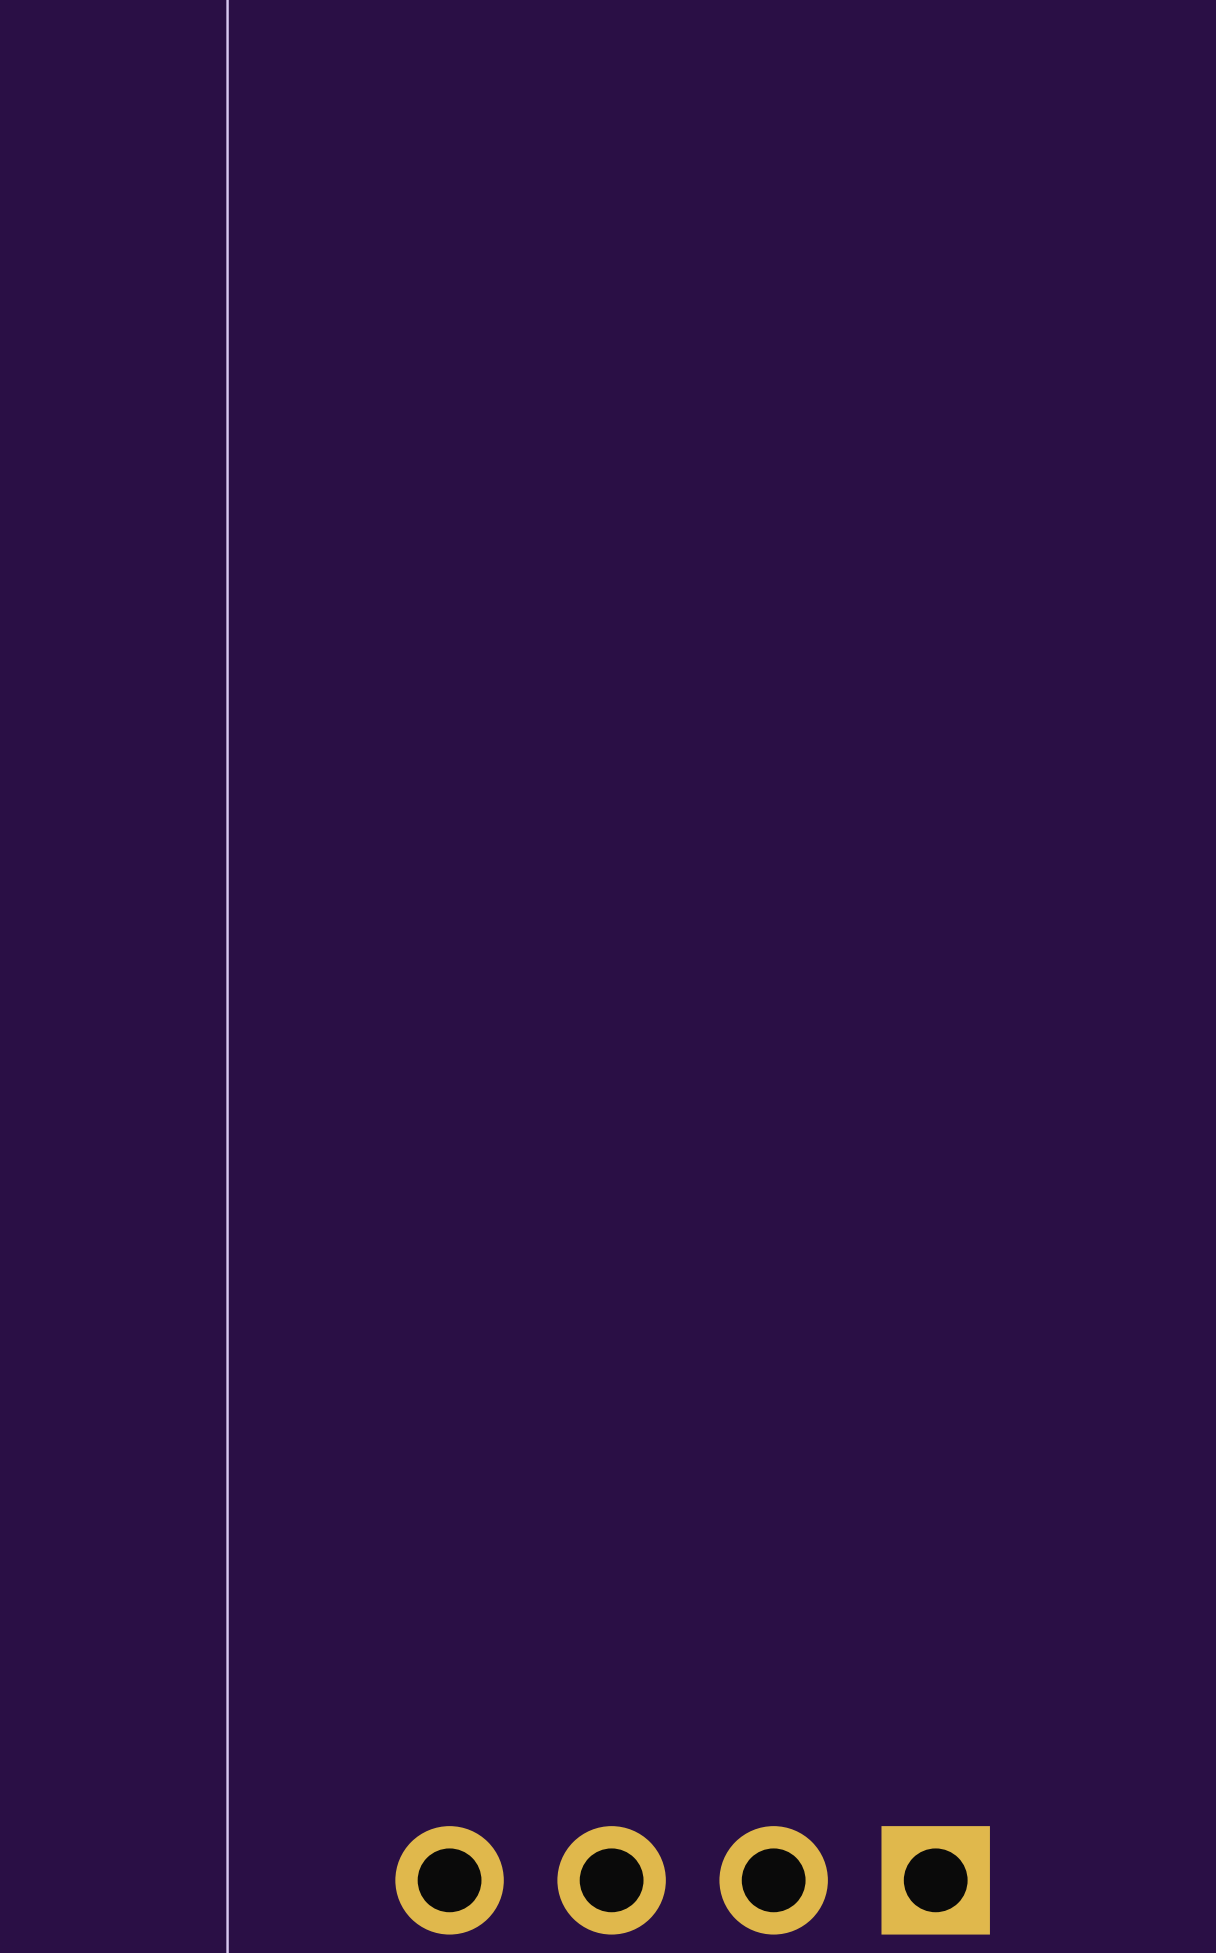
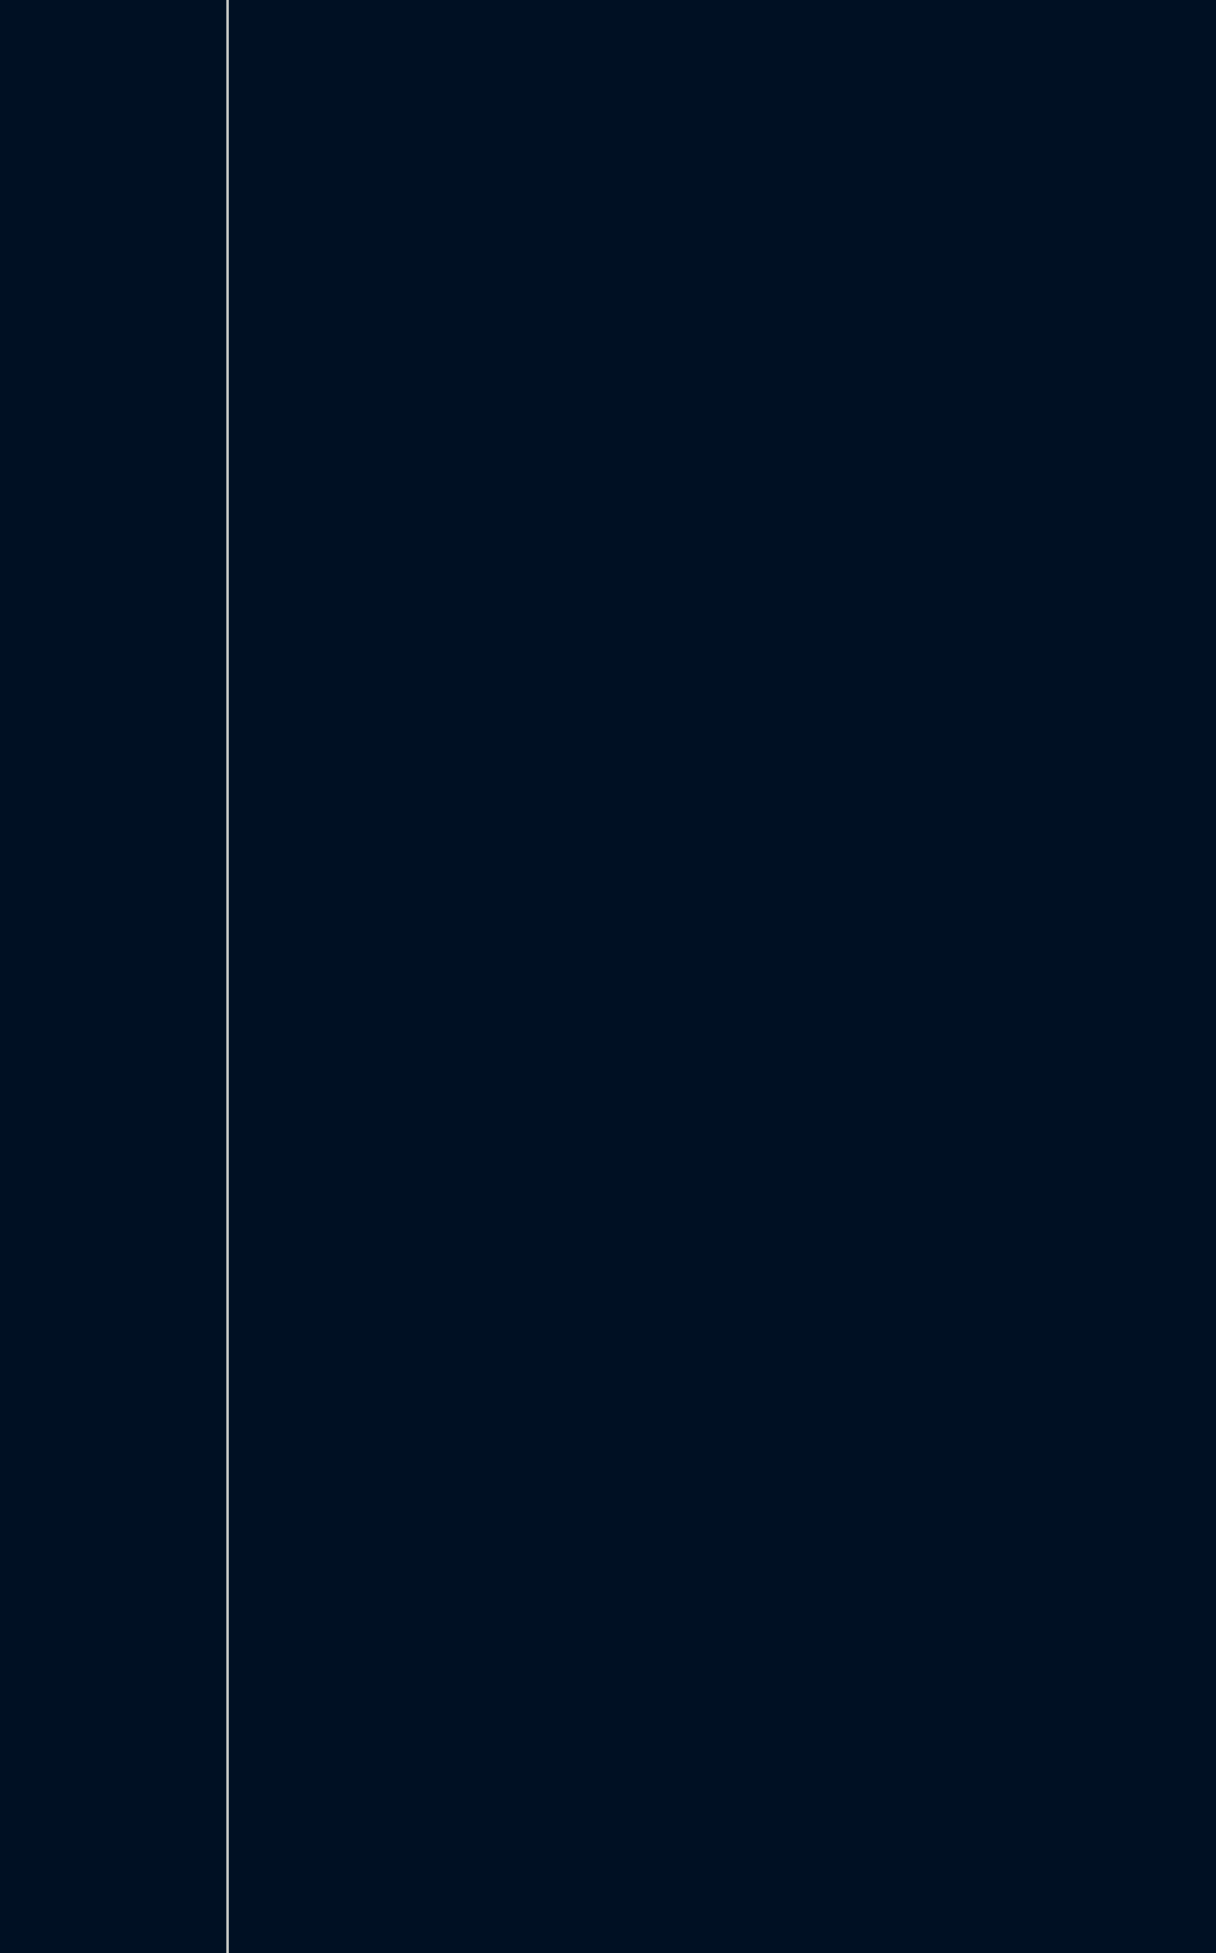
part: (692, 1880) -> none

